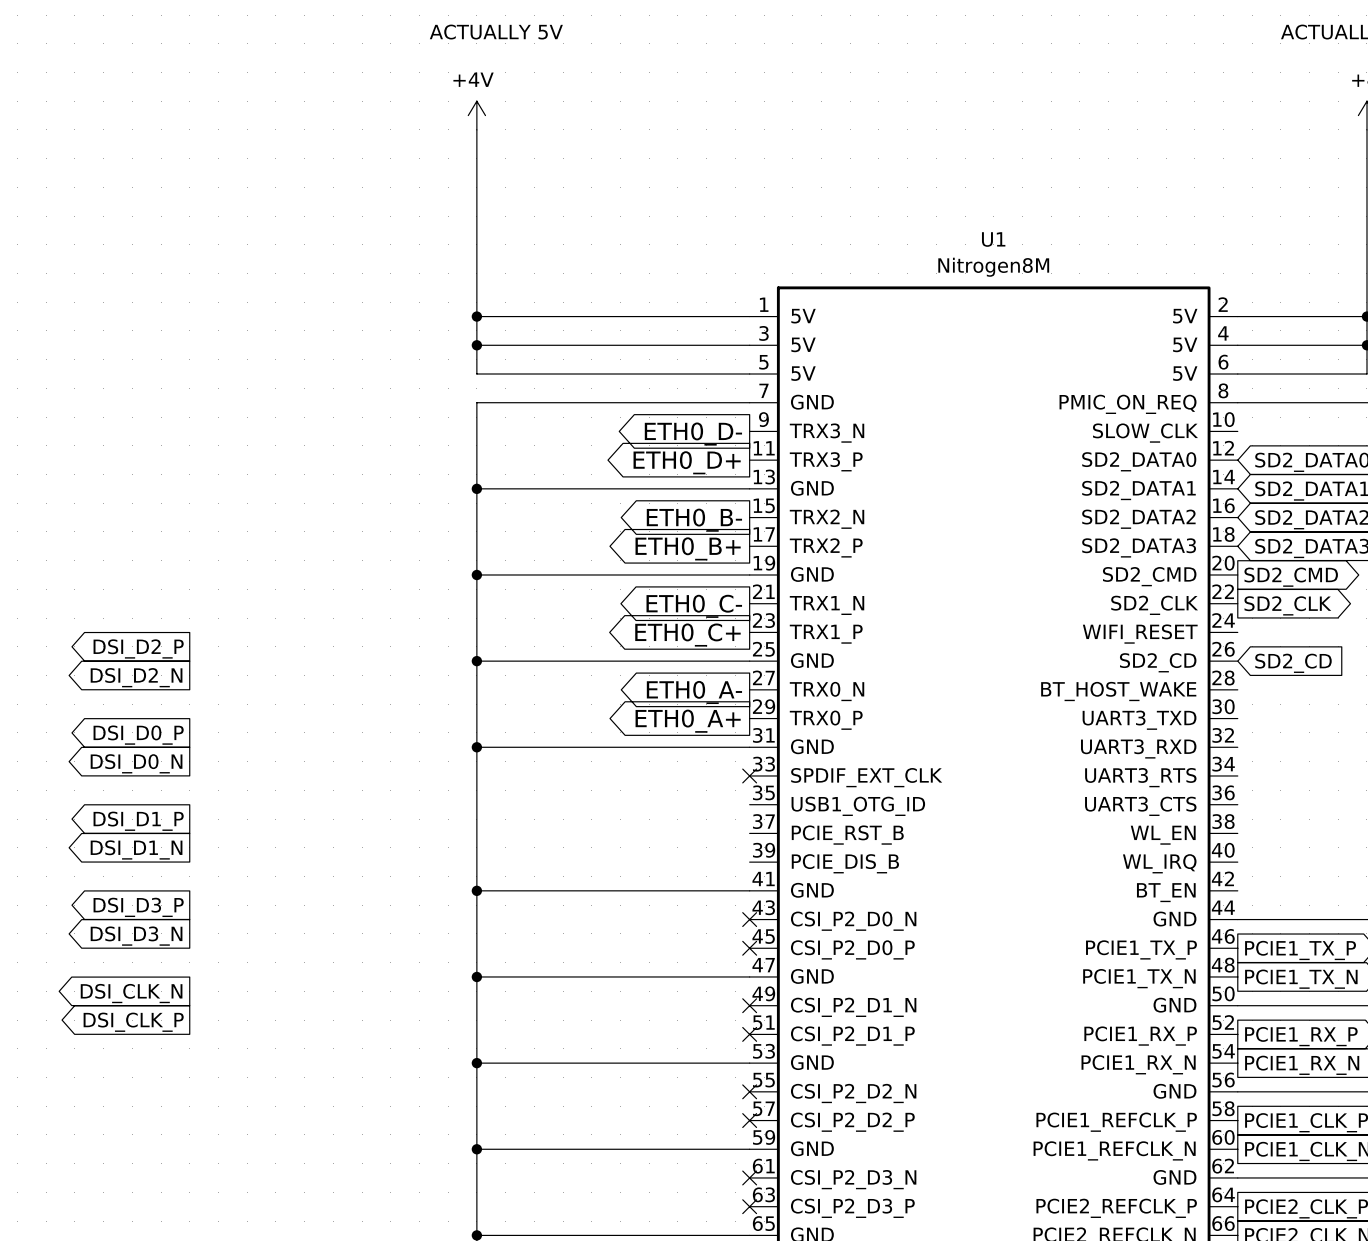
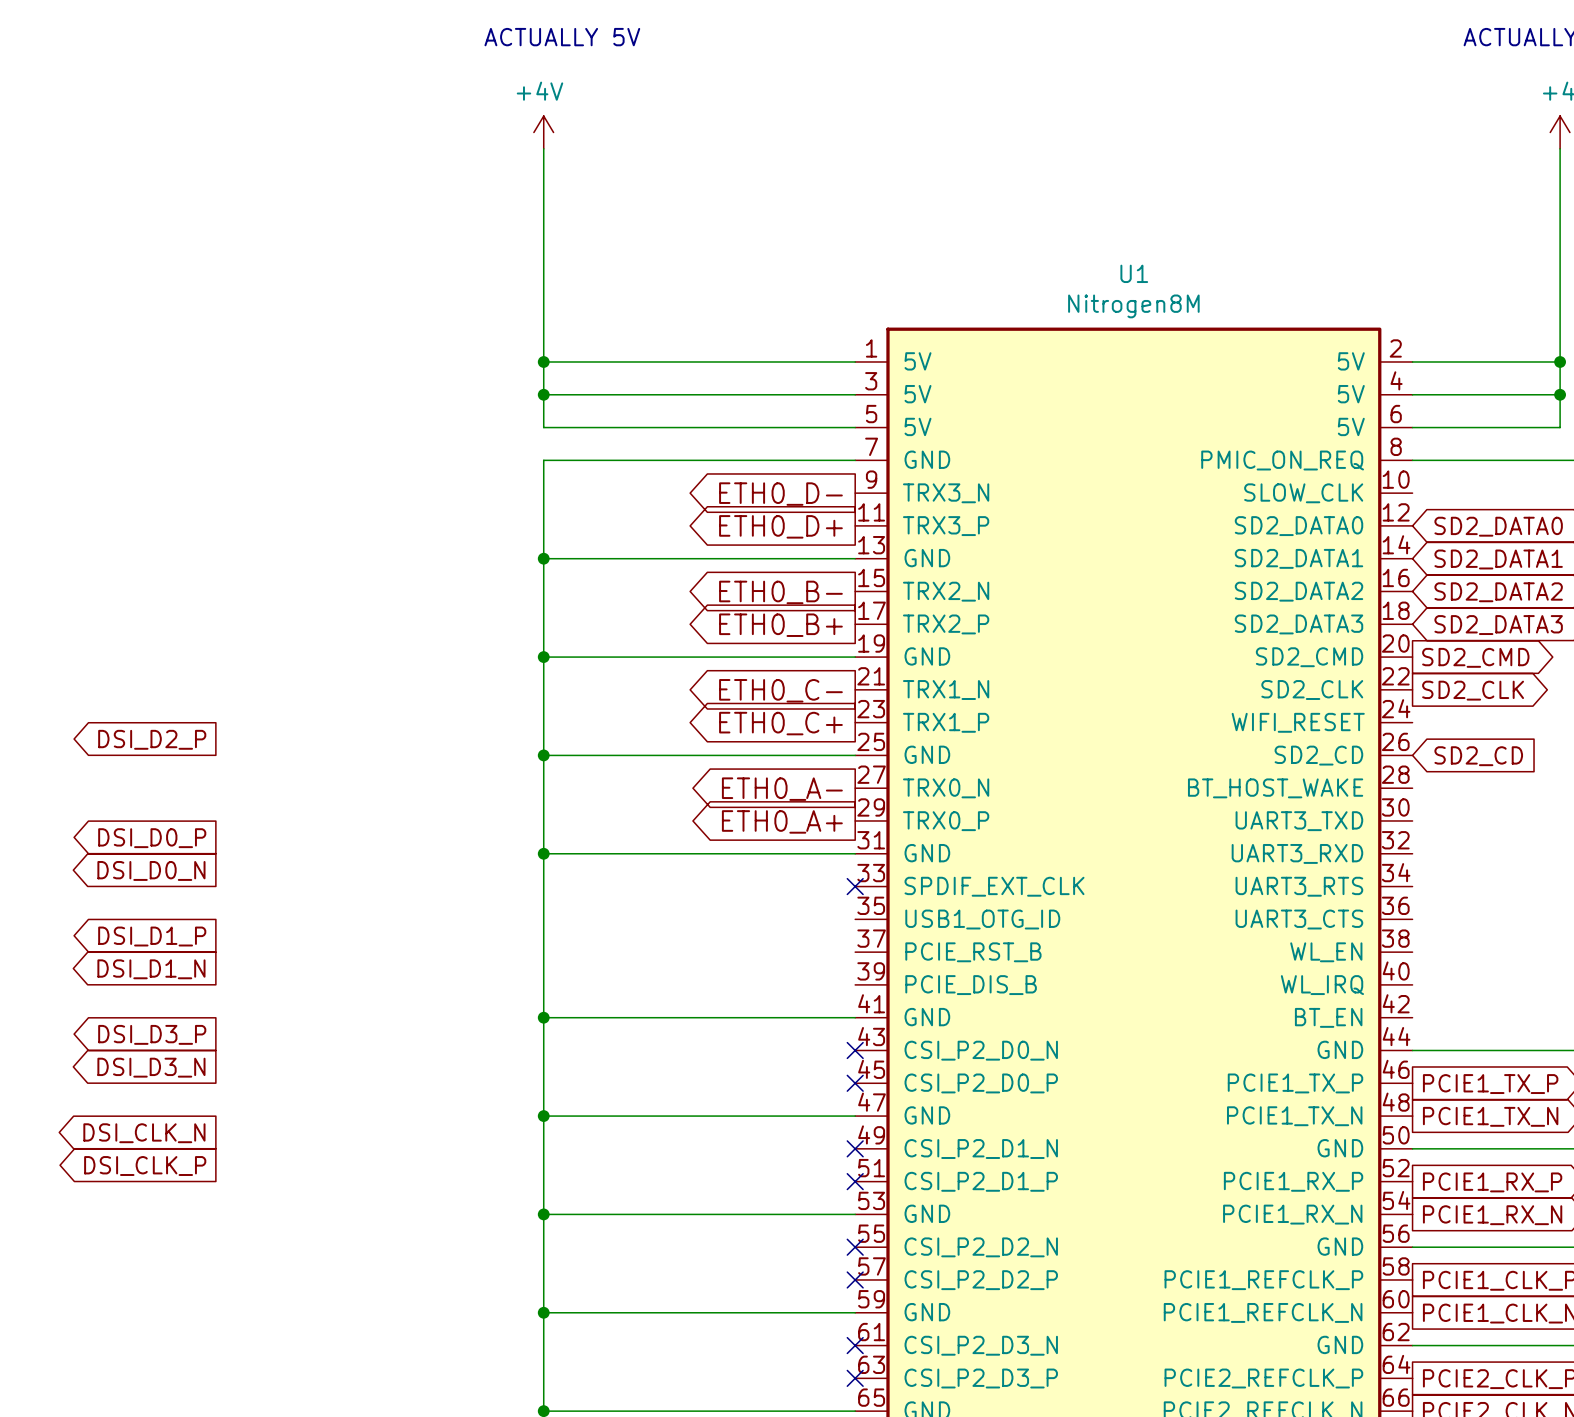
global label: DSI_D2_N (136, 677) -> none

